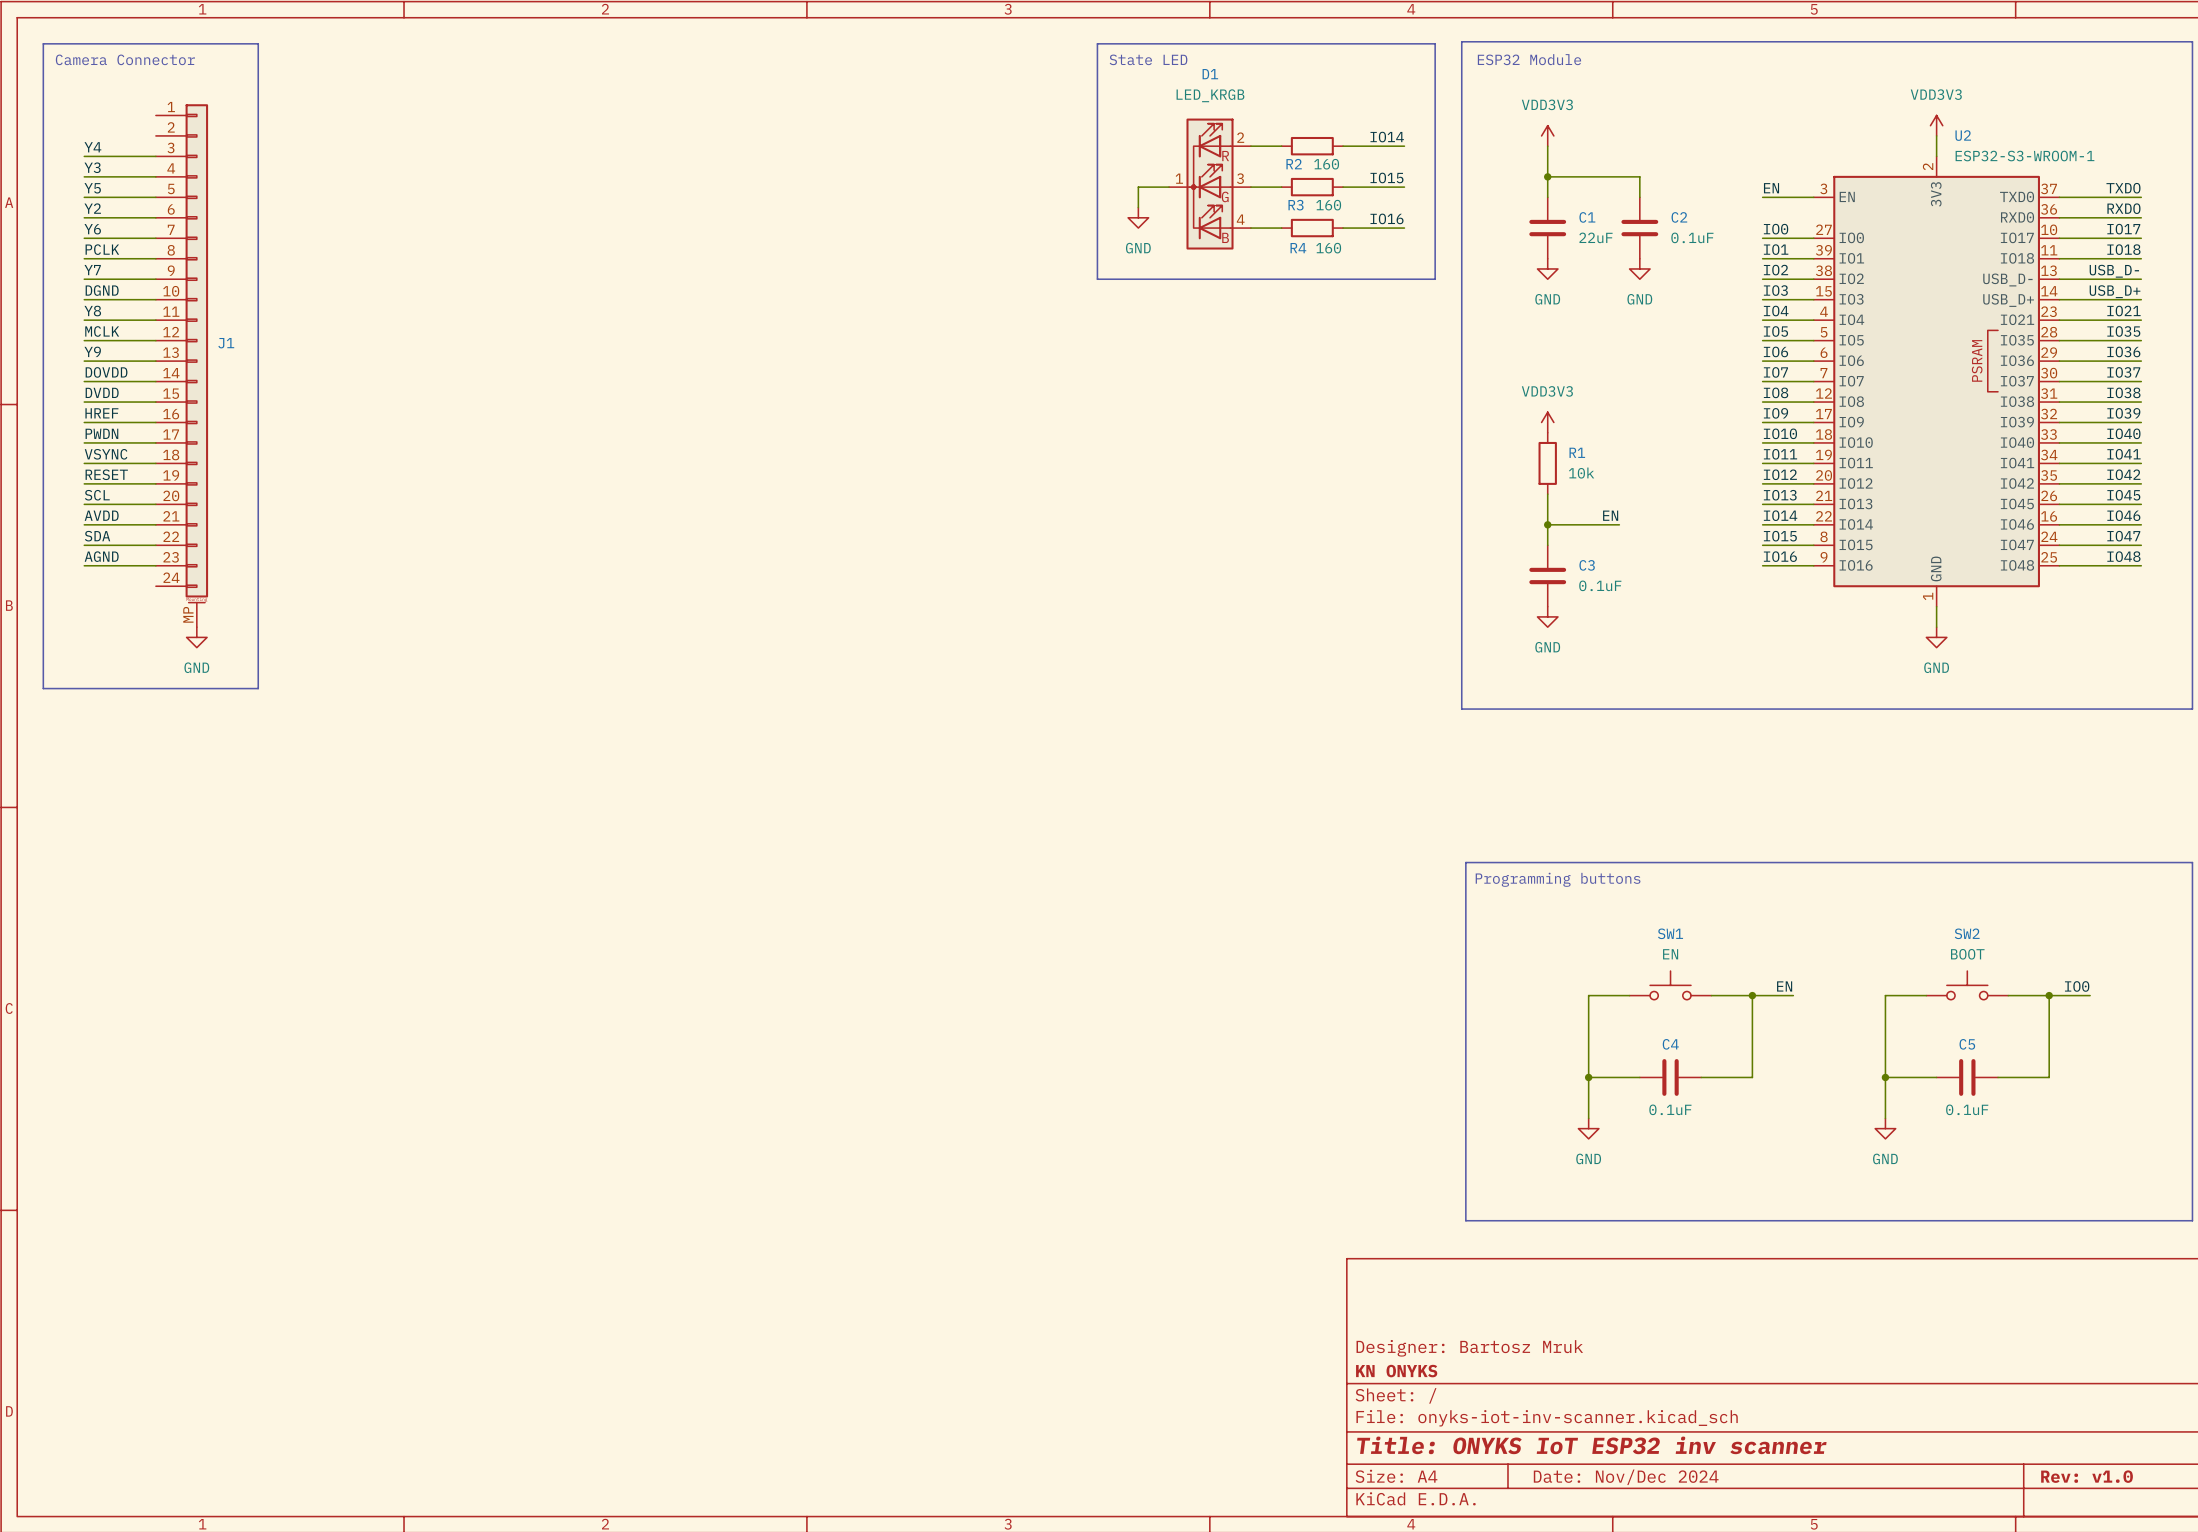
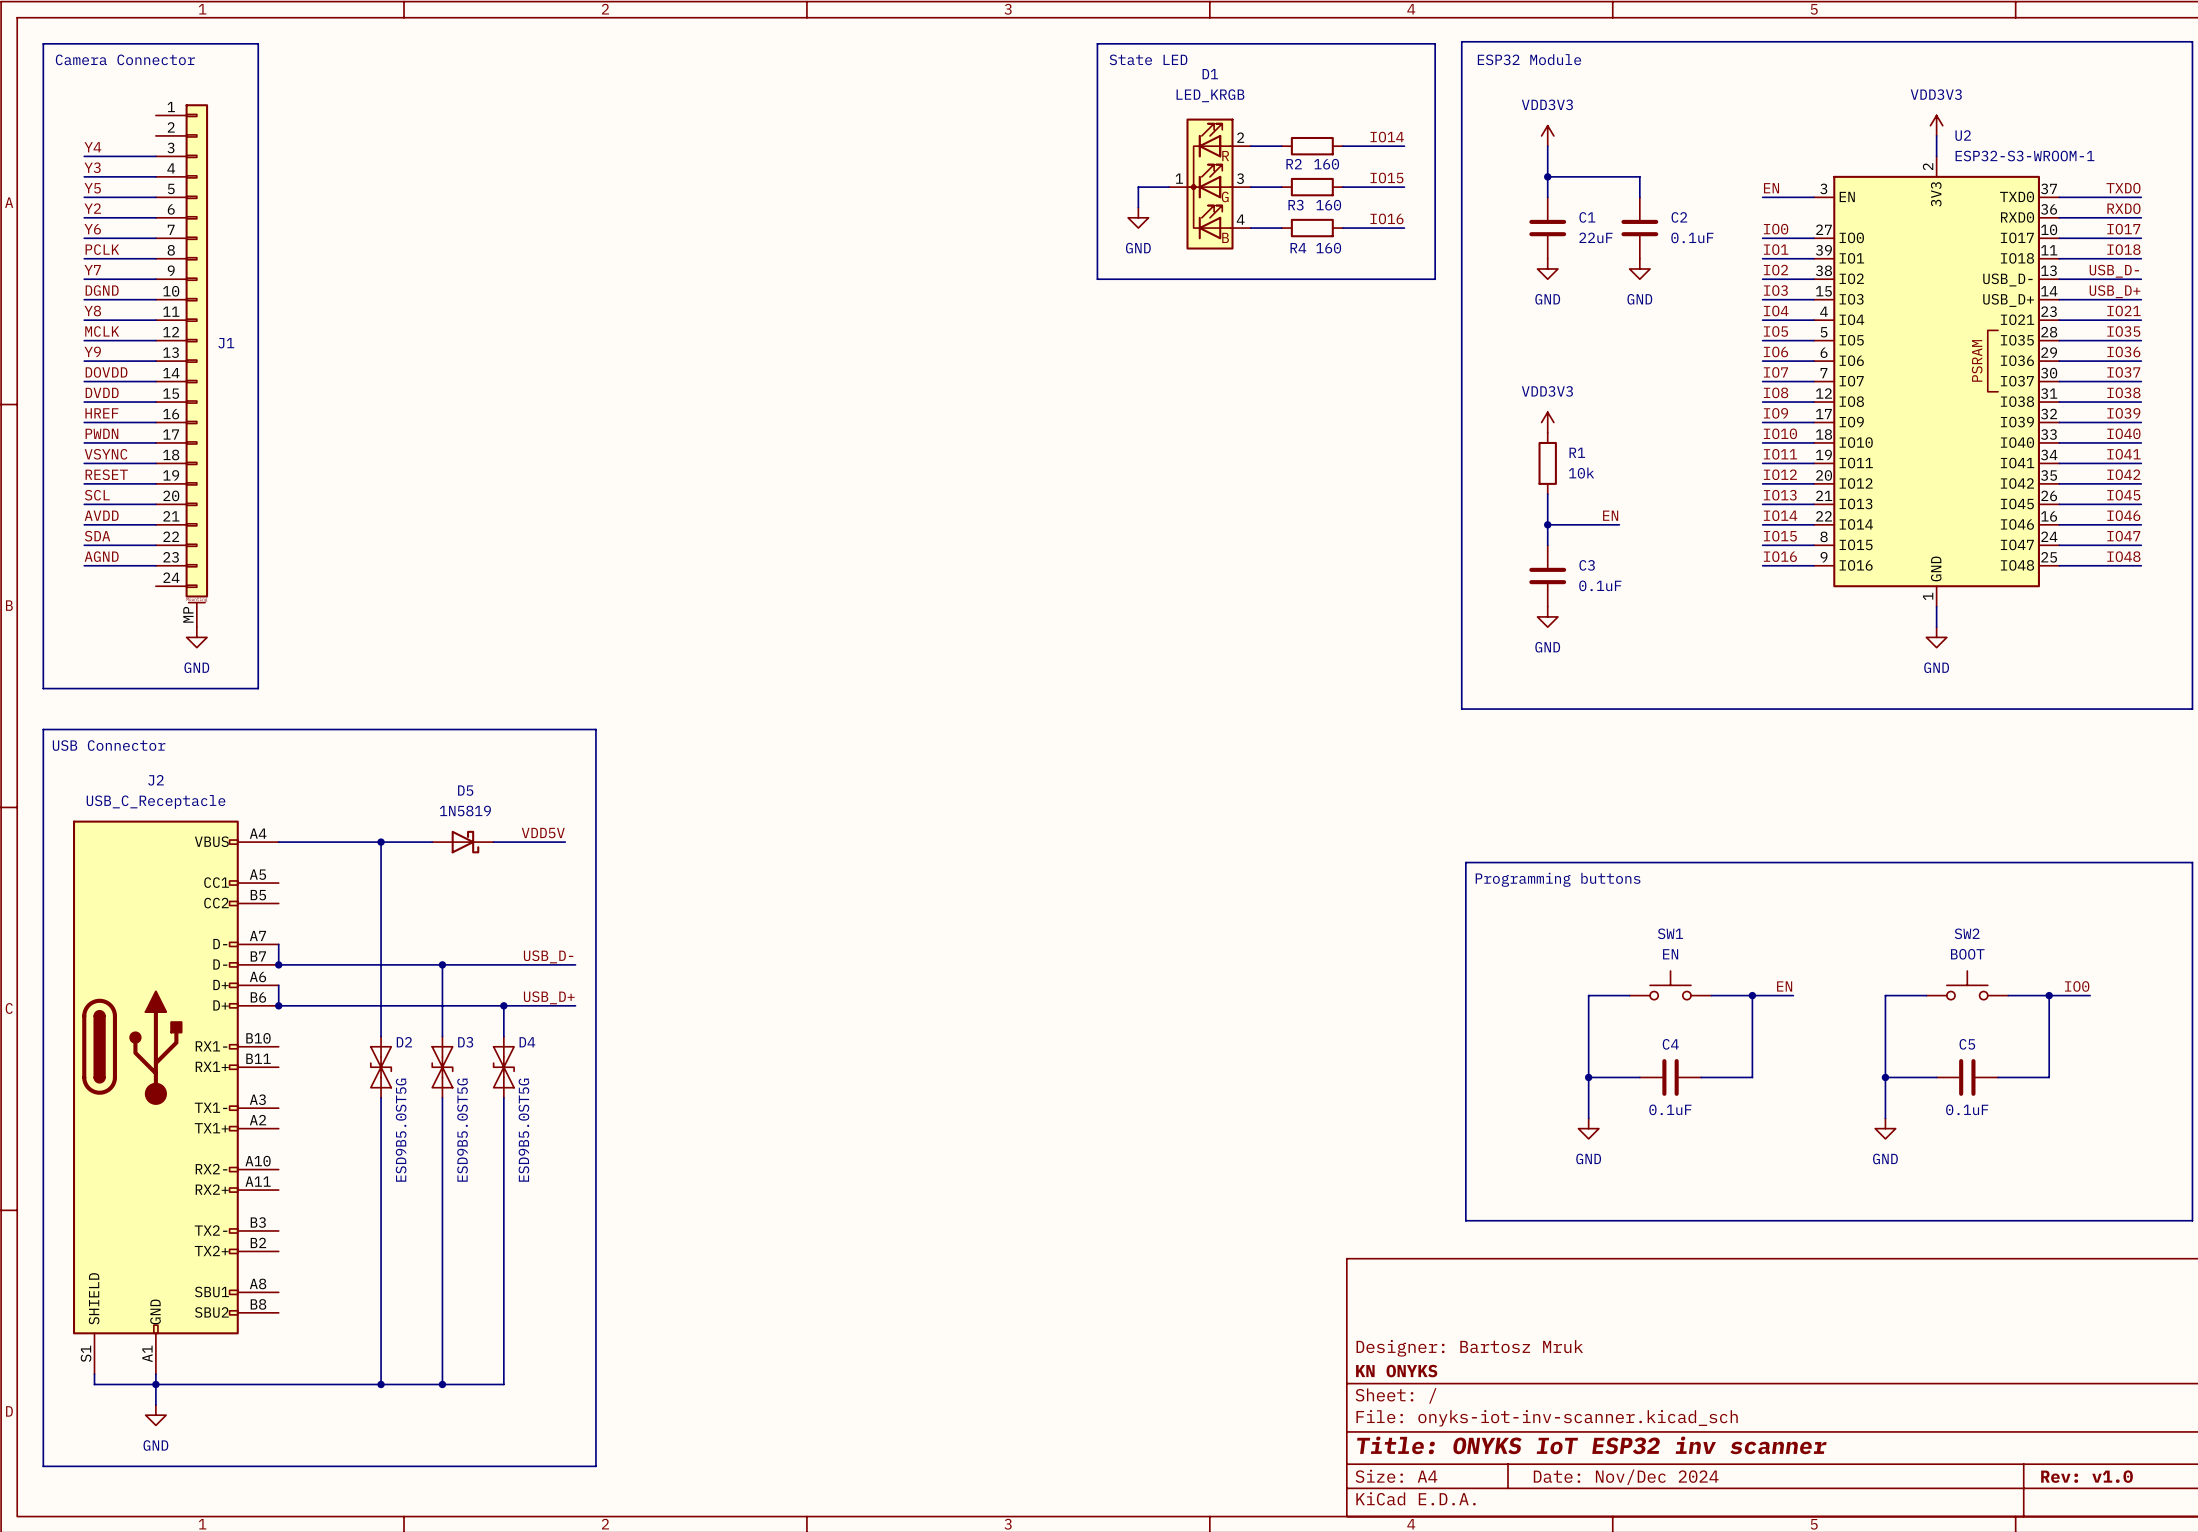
line: none -> (43, 729) (595, 729) (595, 1466) (43, 1466) (43, 729)
text: none -> USB Connector (109, 745)
label: none -> VDD5V (543, 833)
wire: none -> (278, 842) (432, 842)
wire: none -> (381, 842) (381, 1036)
junction: none -> (381, 842)
D5: none -> 1N5819 (462, 842)
wire: none -> (493, 842) (565, 842)
wire: none -> (278, 944) (278, 964) (575, 964)
label: none -> USB_D- (548, 956)
junction: none -> (278, 964)
wire: none -> (442, 964) (442, 1036)
junction: none -> (442, 964)
wire: none -> (278, 985) (278, 1005) (575, 1005)
label: none -> USB_D+ (549, 997)
junction: none -> (278, 1005)
wire: none -> (503, 1005) (503, 1036)
junction: none -> (503, 1005)
D2: none -> ESD9B5.0ST5G (381, 1067)
D3: none -> ESD9B5.0ST5G (442, 1067)
D4: none -> ESD9B5.0ST5G (503, 1067)
J2: none -> USB_C_Receptacle (175, 1097)
wire: none -> (381, 1097) (381, 1384)
wire: none -> (442, 1097) (442, 1384)
wire: none -> (503, 1097) (503, 1384) (94, 1384) (94, 1374)
wire: none -> (155, 1374) (155, 1404)
junction: none -> (155, 1384)
junction: none -> (381, 1384)
junction: none -> (442, 1384)
power symbol: none -> GND (155, 1415)

